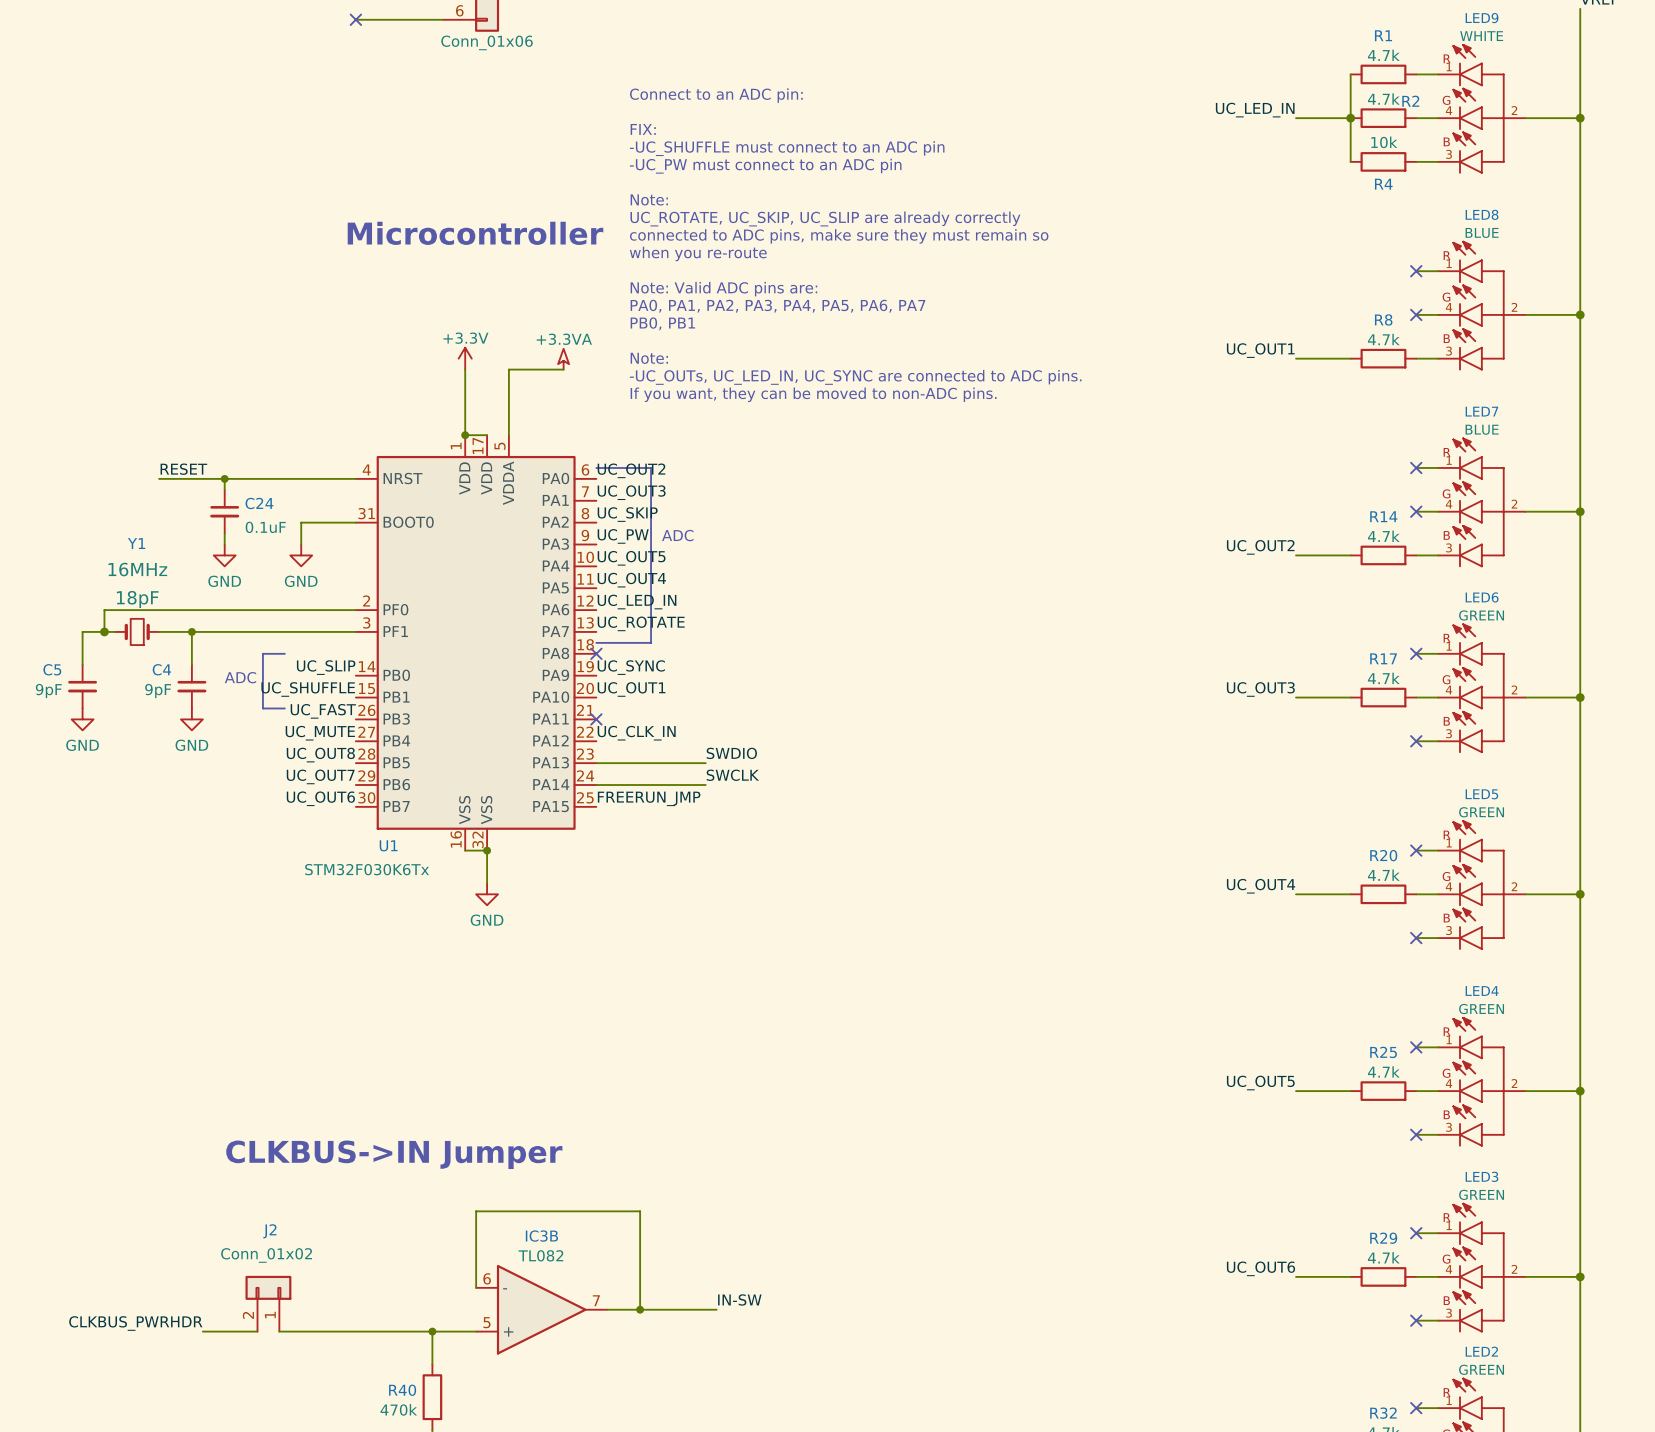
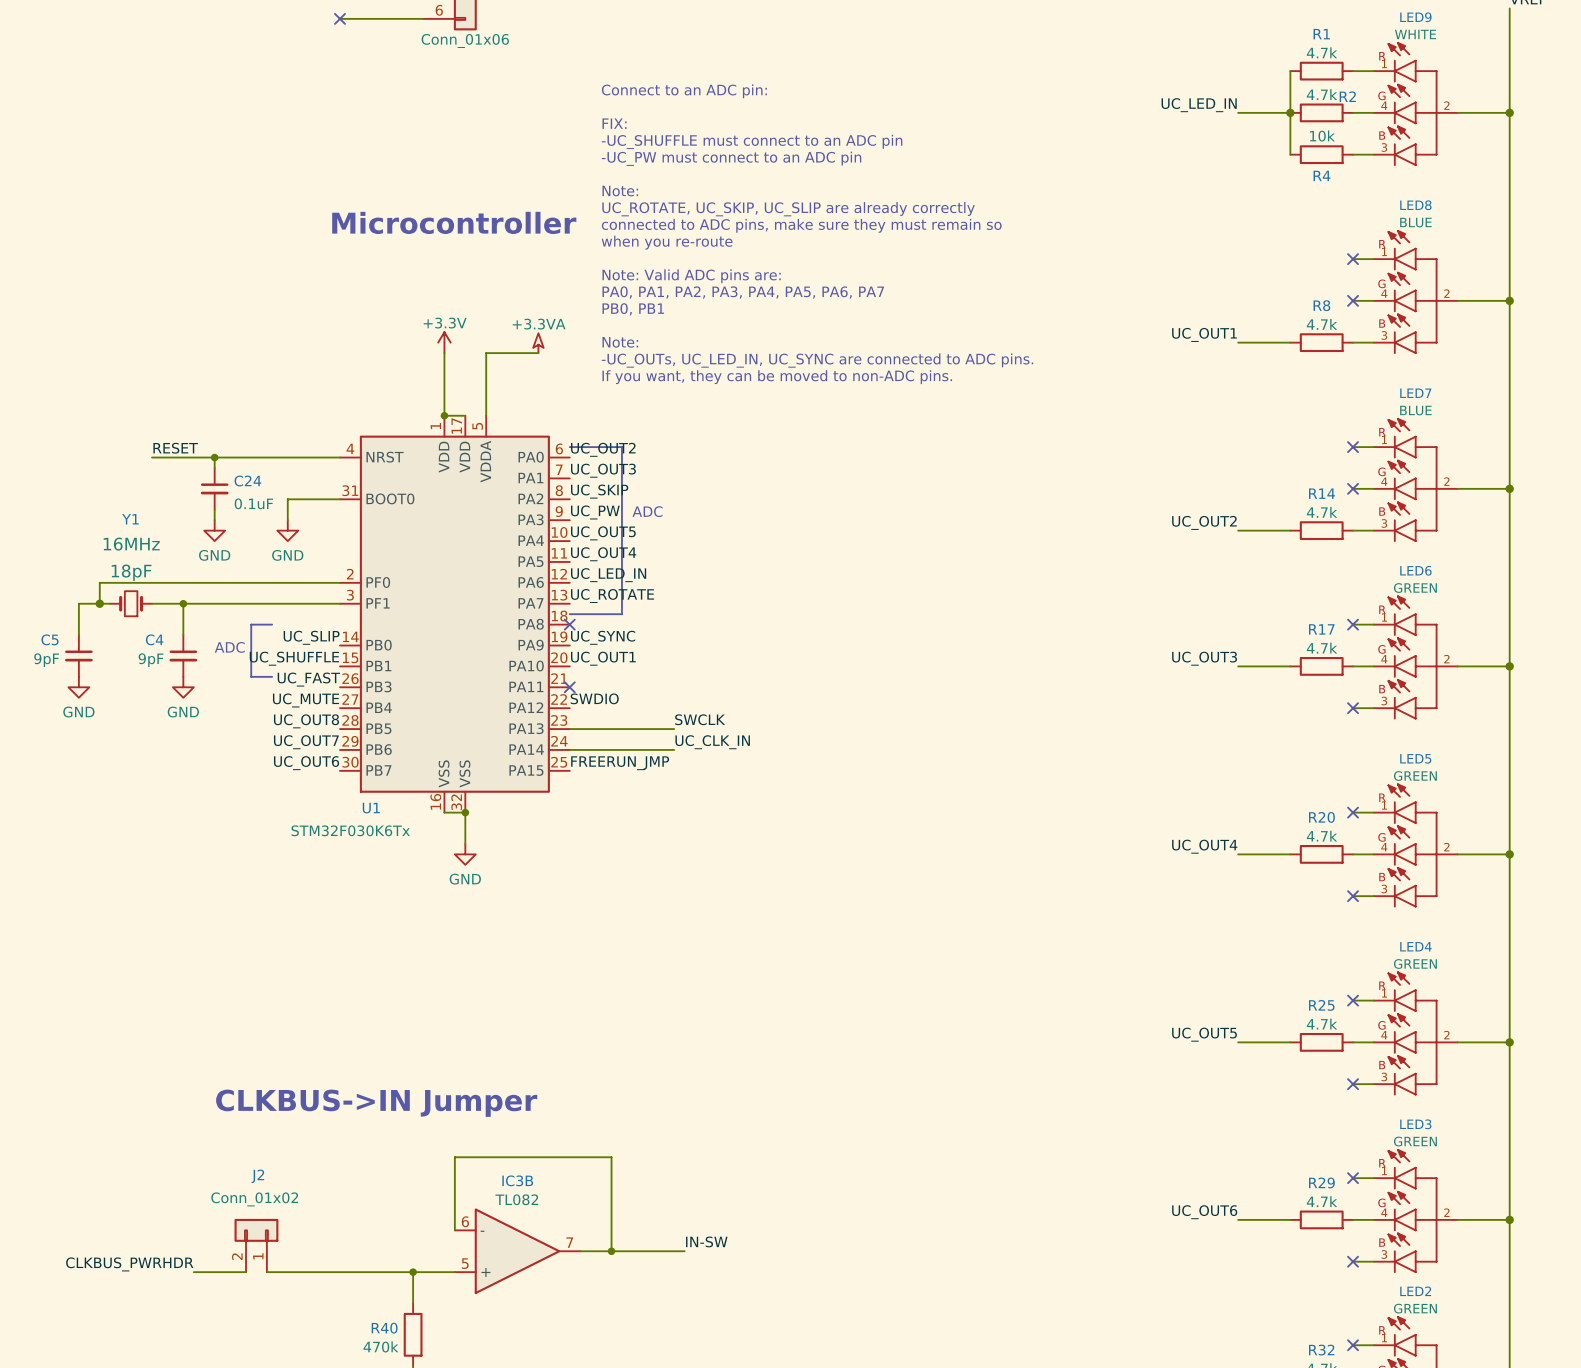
label: UC_CLK_IN (636, 733) -> SWDIO (594, 698)
label: SWDIO (731, 753) -> SWCLK (700, 719)
label: SWCLK (732, 775) -> UC_CLK_IN (712, 742)

